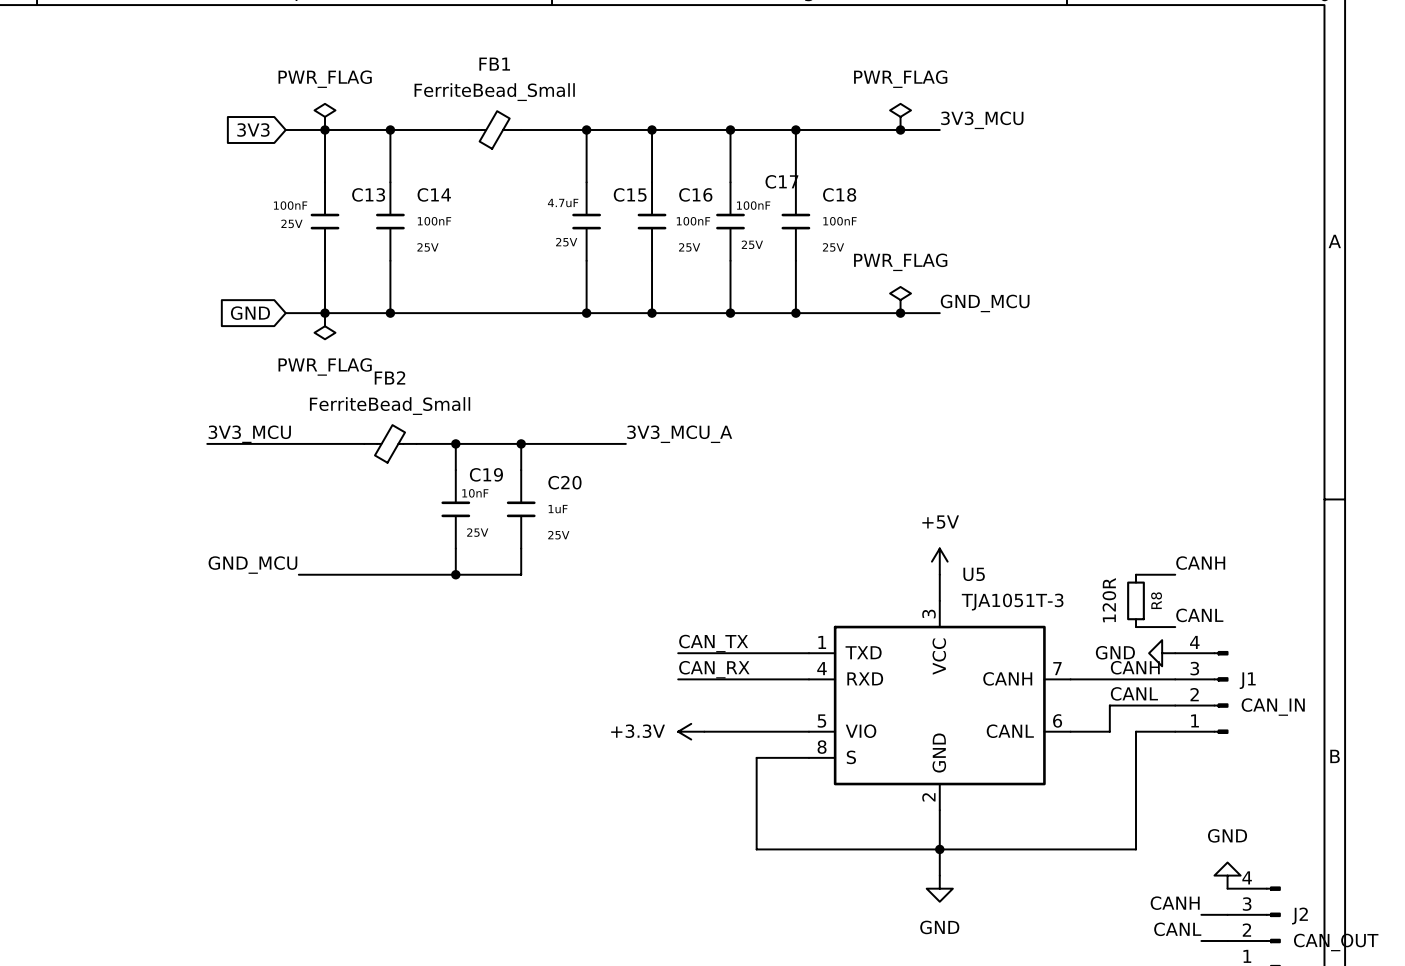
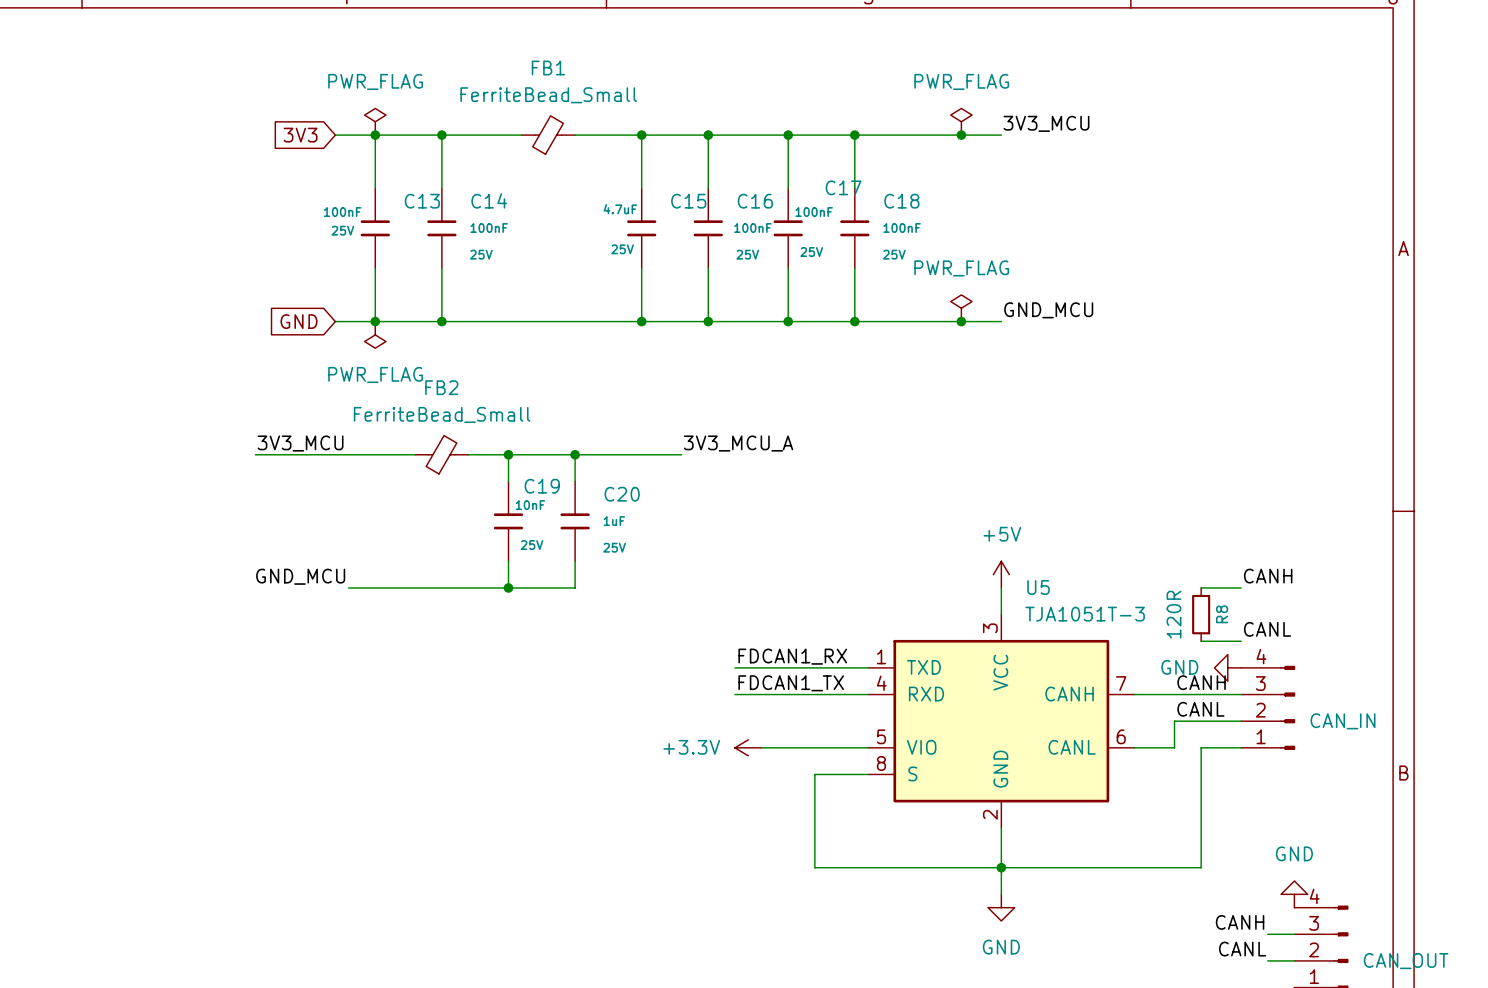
label: CAN_TX (713, 643) -> FDCAN1_RX (792, 656)
label: CAN_RX (714, 669) -> FDCAN1_TX (791, 683)
J1 name: J1 (1247, 680) -> none
J2 name: J2 (1299, 916) -> none

